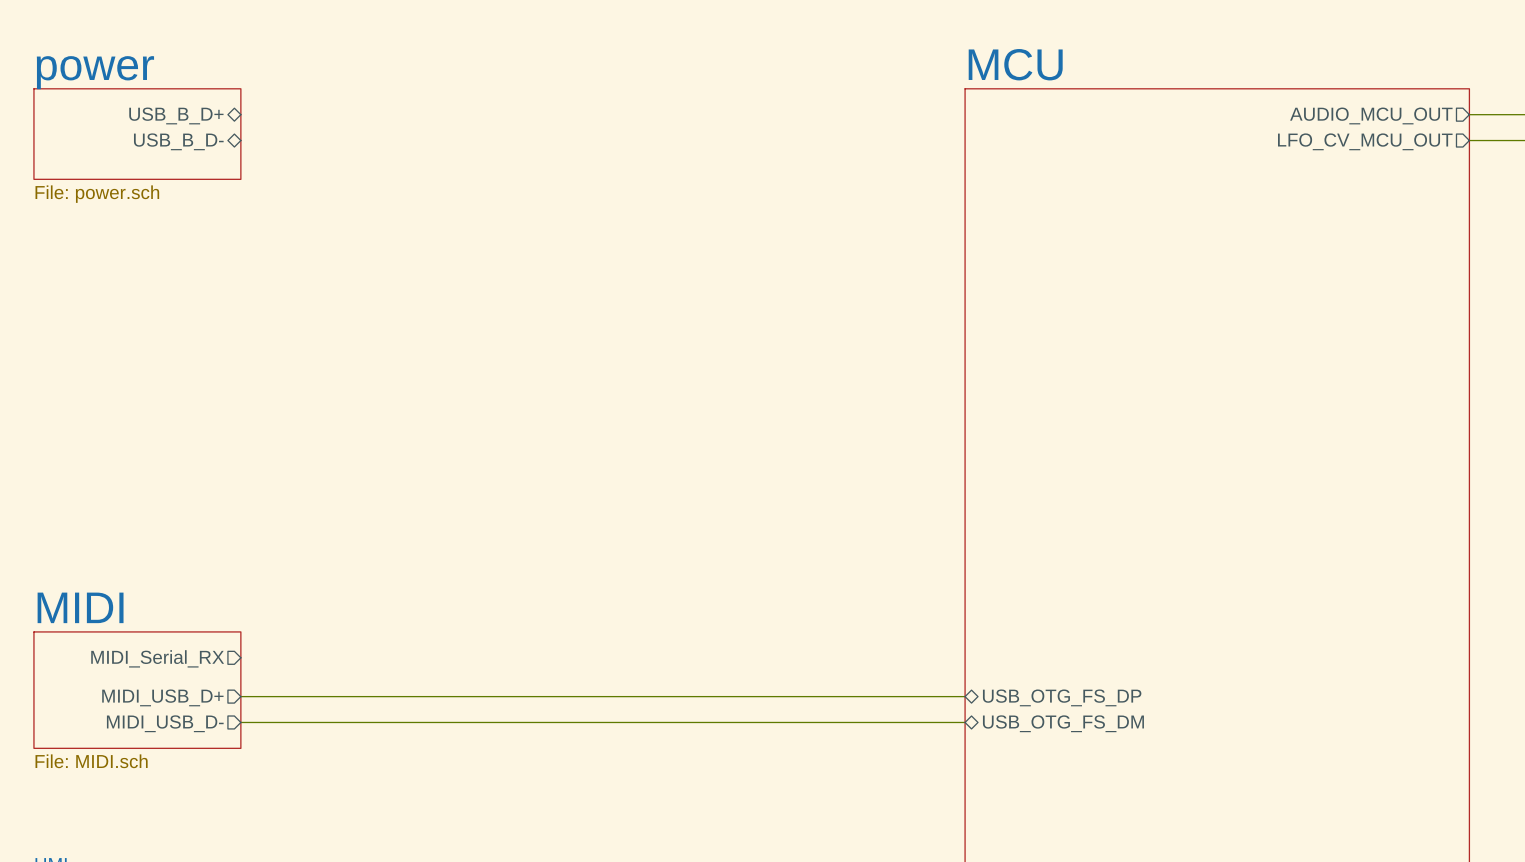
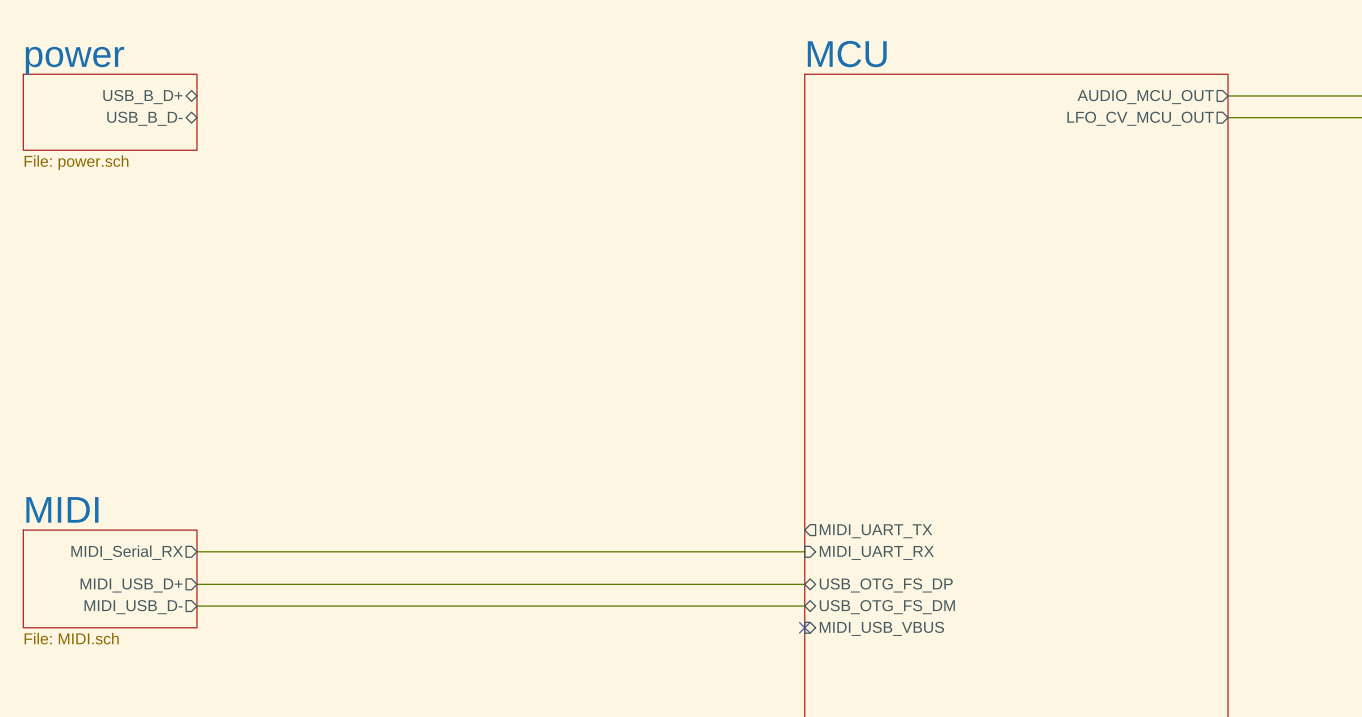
sheet pin: none -> MIDI_UART_TX (875, 531)
wire: none -> (196, 551) (804, 551)
sheet pin: none -> MIDI_UART_RX (876, 552)
no-connect mark: none -> (804, 627)
sheet pin: none -> MIDI_USB_VBUS (881, 628)

